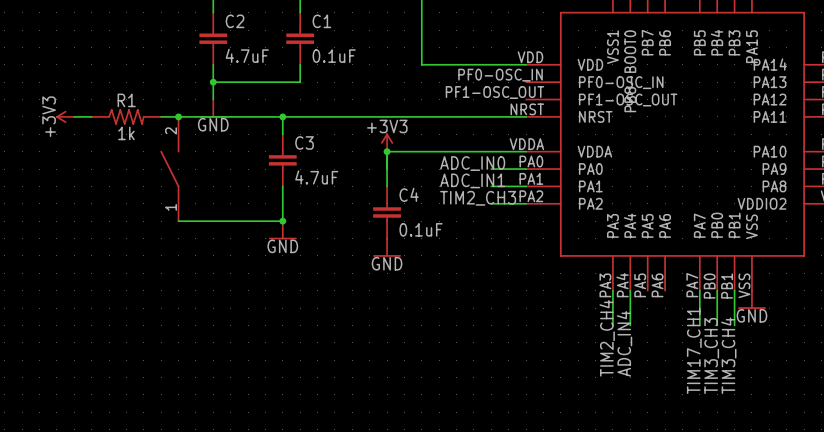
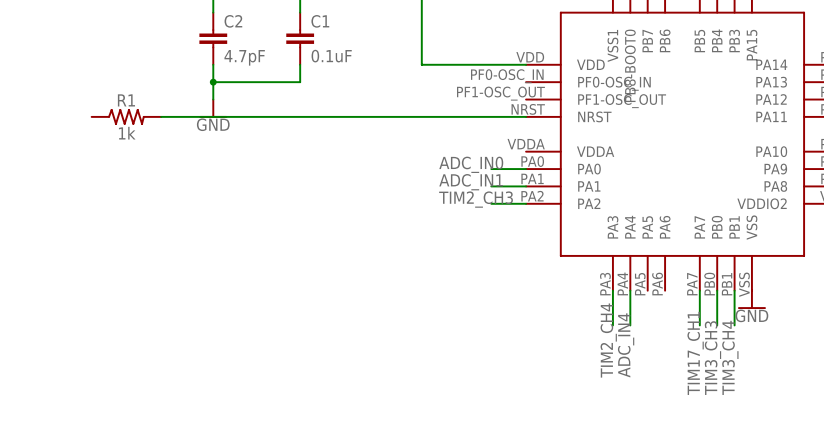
C2 value: 4.7uF (247, 55) -> 4.7pF (244, 57)
power symbol: +3V3 (65, 116) -> none
wire: (74, 116) (91, 116) -> none
junction: (178, 116) -> none
wire: (282, 116) (282, 134) -> none
junction: (282, 116) -> none
power symbol: +3V3 (387, 142) -> none
junction: (387, 151) -> none
wire: (526, 151) (387, 151) (387, 186) -> none
C3: 4.7uF (282, 160) -> none
part: (169, 169) -> none
wire: (282, 186) (282, 221) (178, 221) -> none
C4: 0.1uF (387, 212) -> none
junction: (282, 221) -> none
power symbol: GND (282, 230) -> none
power symbol: GND (387, 247) -> none

